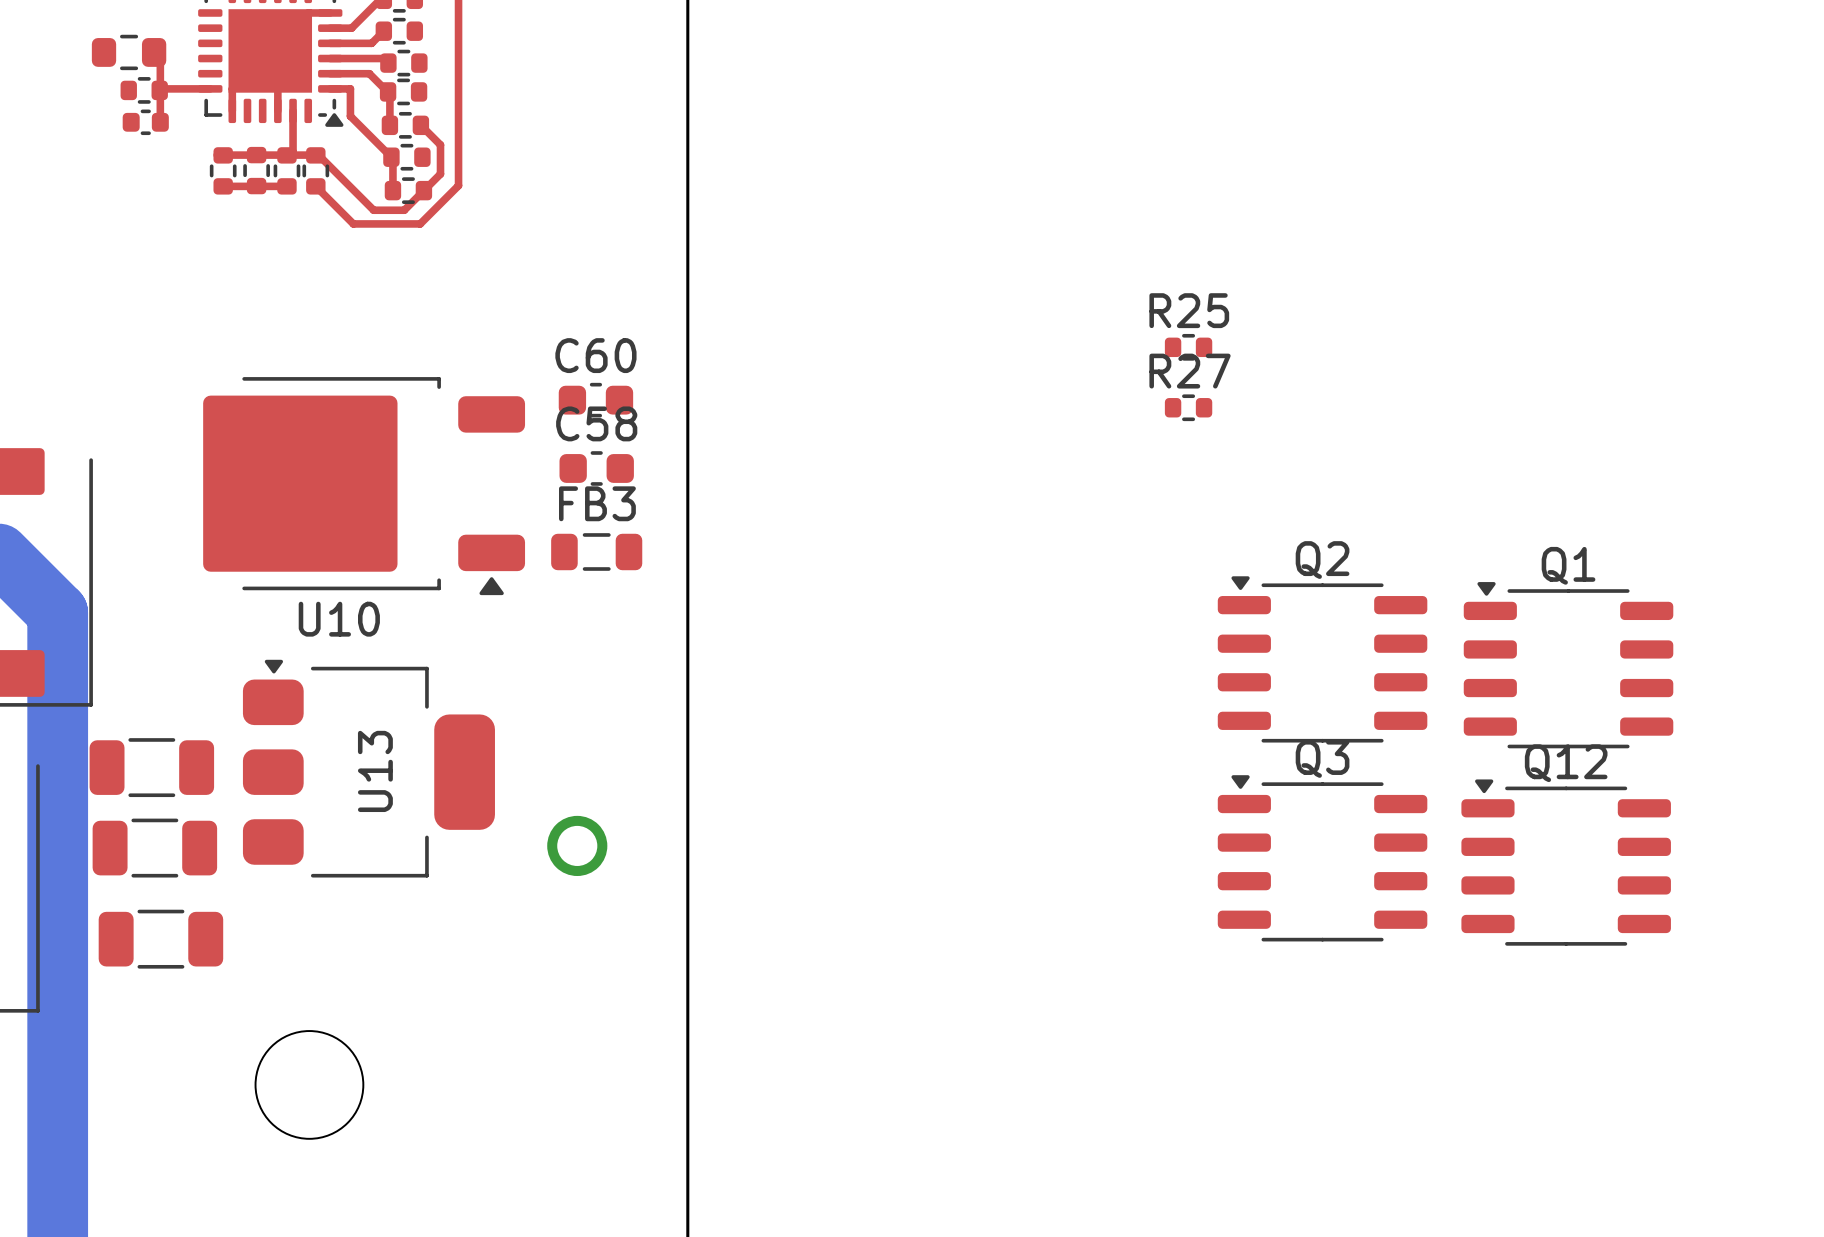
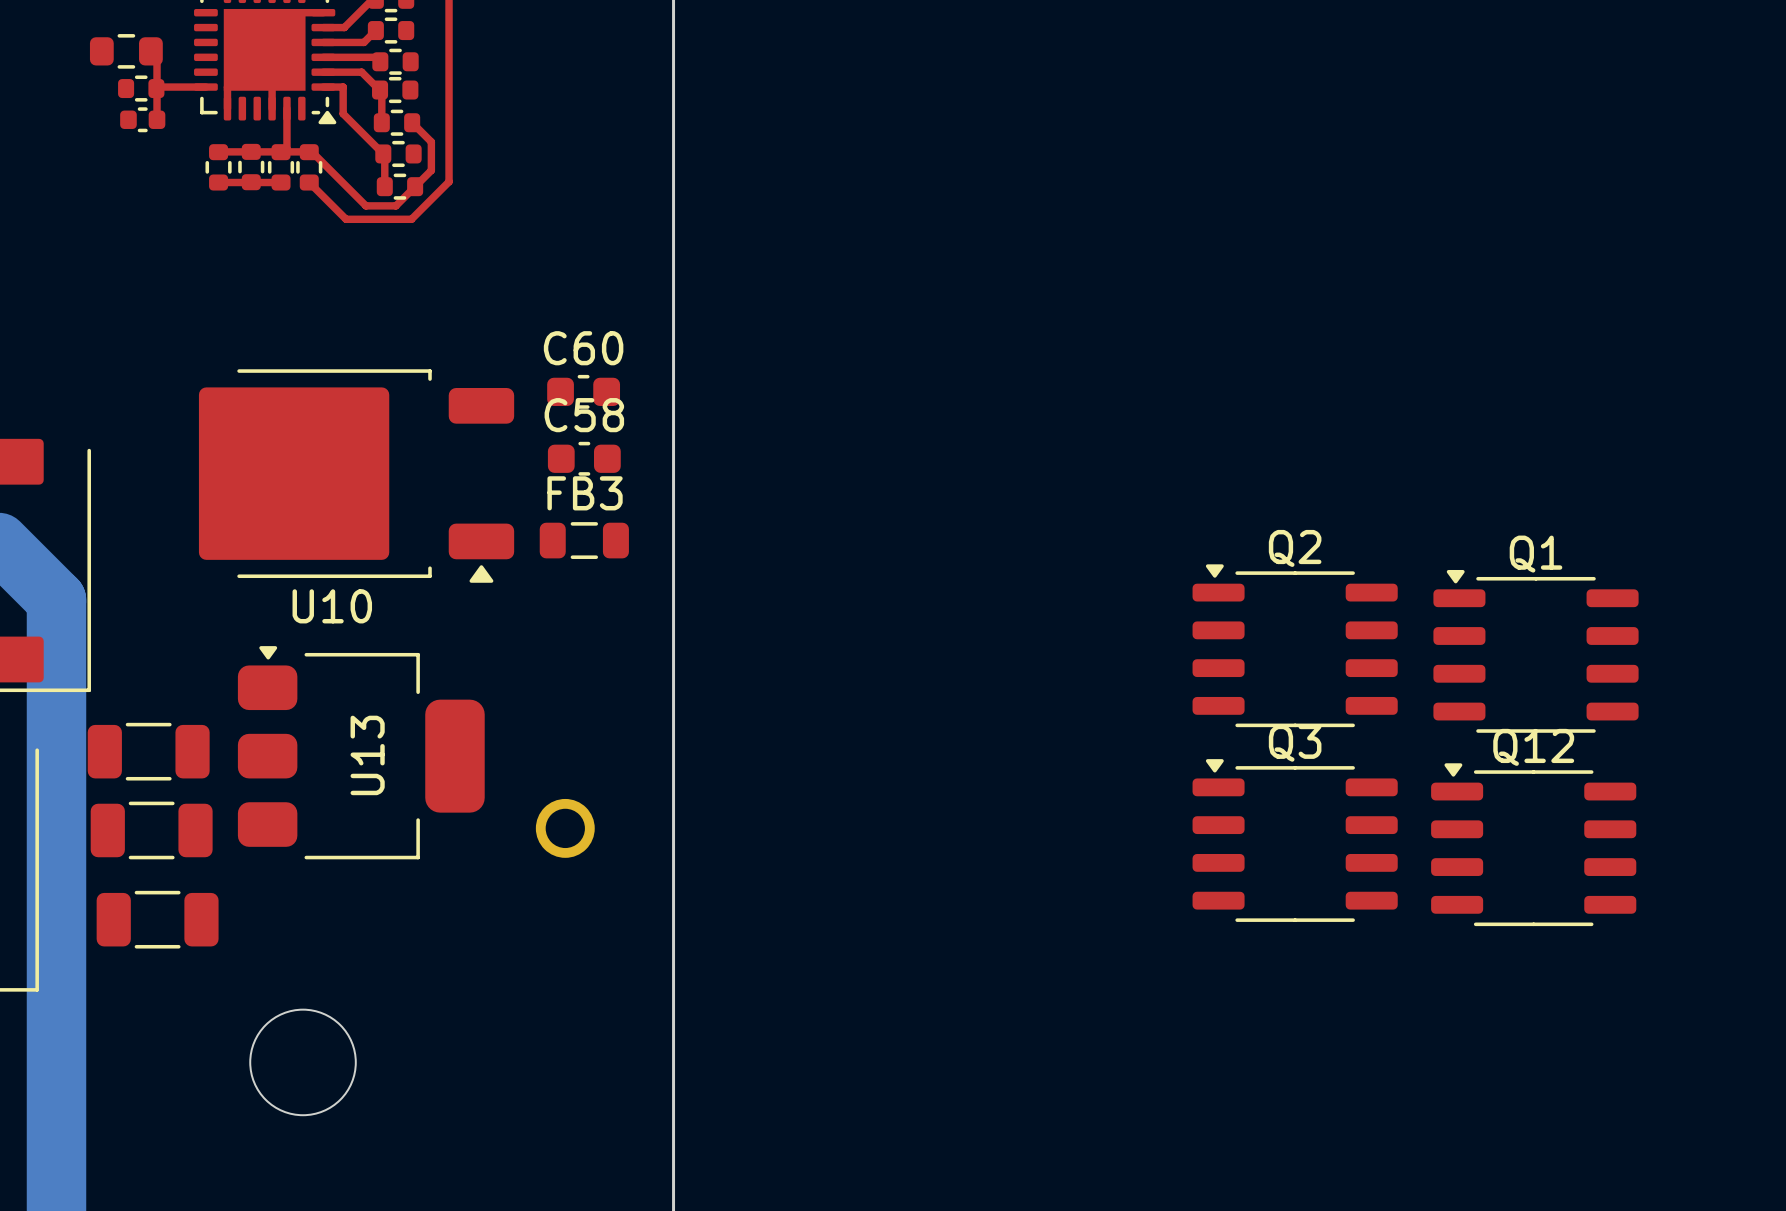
R25: (1188, 347) -> none
R27: (1188, 407) -> none

